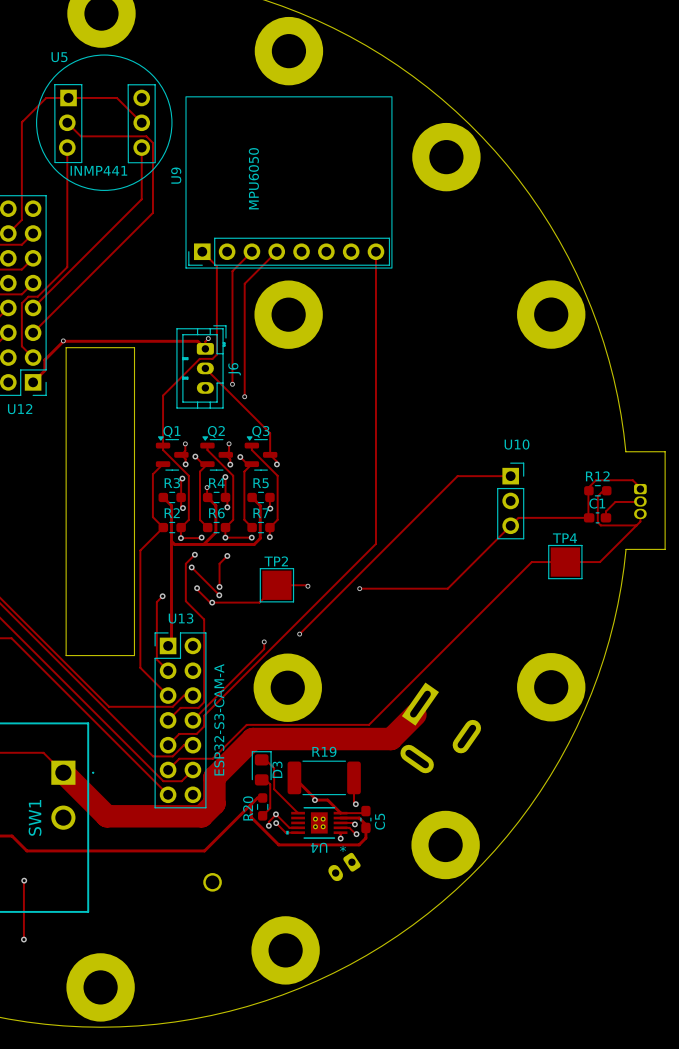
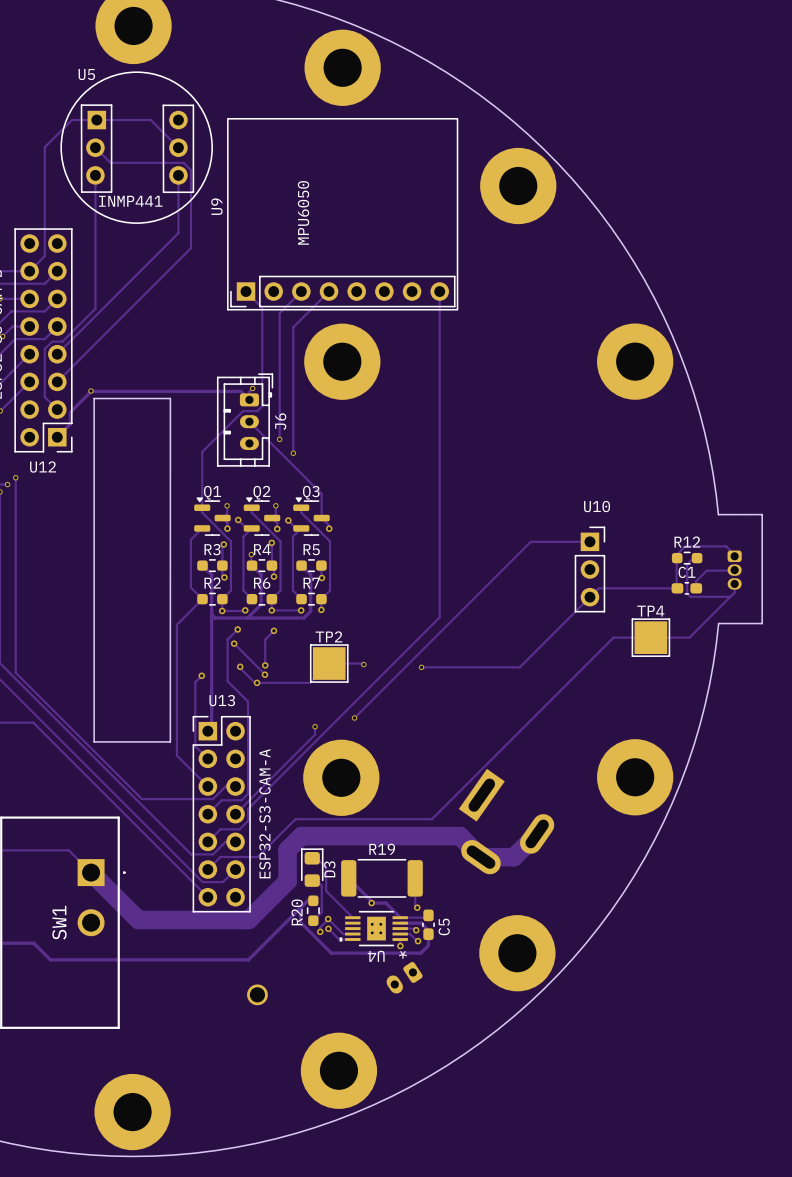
part footprint: [400, 682, 482, 774] -> [458, 768, 555, 875]
track: (415, 714) (391, 739) (252, 739) (214, 777) (214, 803) (201, 816) (105, 815) -> (537, 833) (513, 857) (480, 857) (459, 836) (301, 836) (287, 849) (287, 881) (248, 919) (138, 919)
track width: thick (63, 772) (105, 815) -> thin (91, 872) (138, 919)
track: (24, 880) (23, 939) -> none
via: (24, 880) -> none
via: (23, 939) -> none

